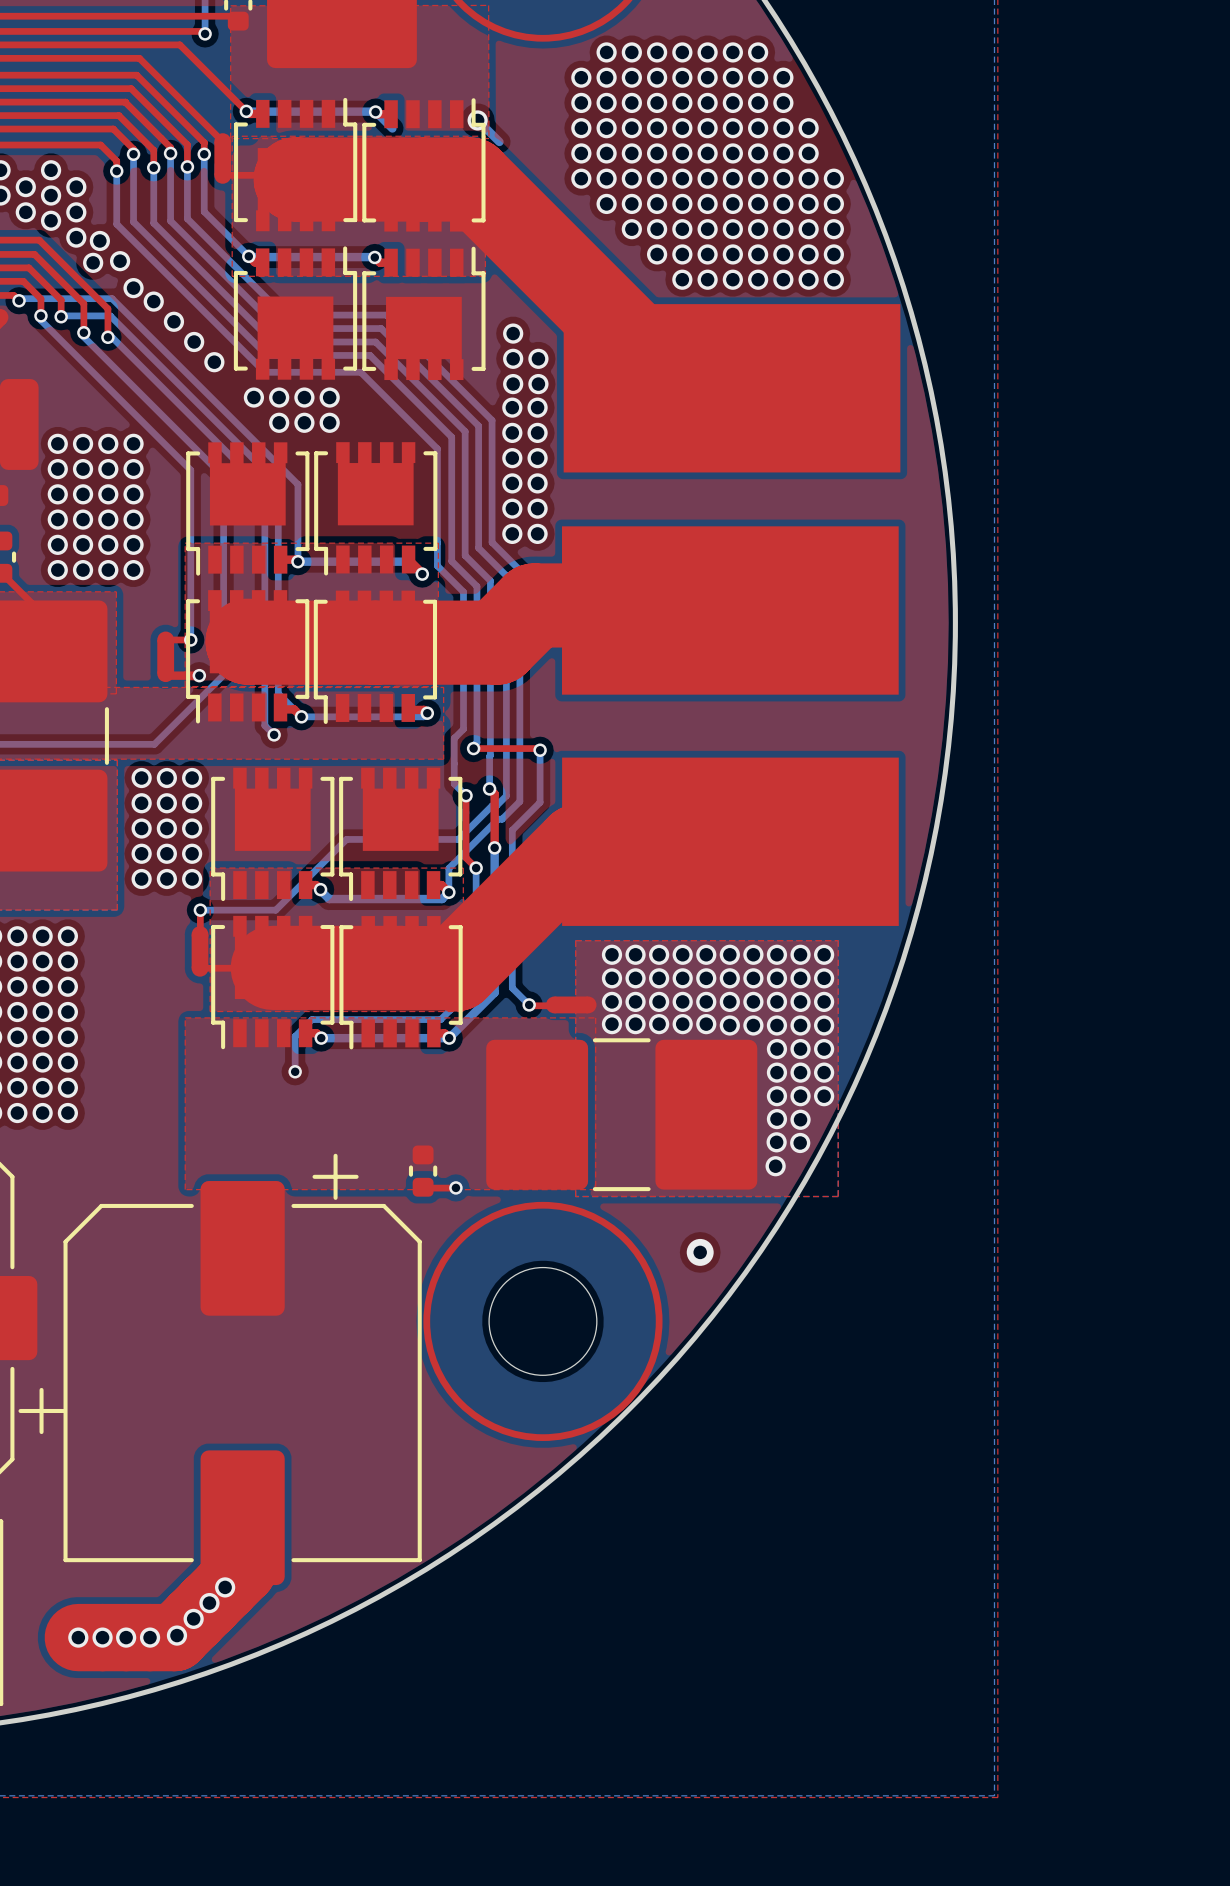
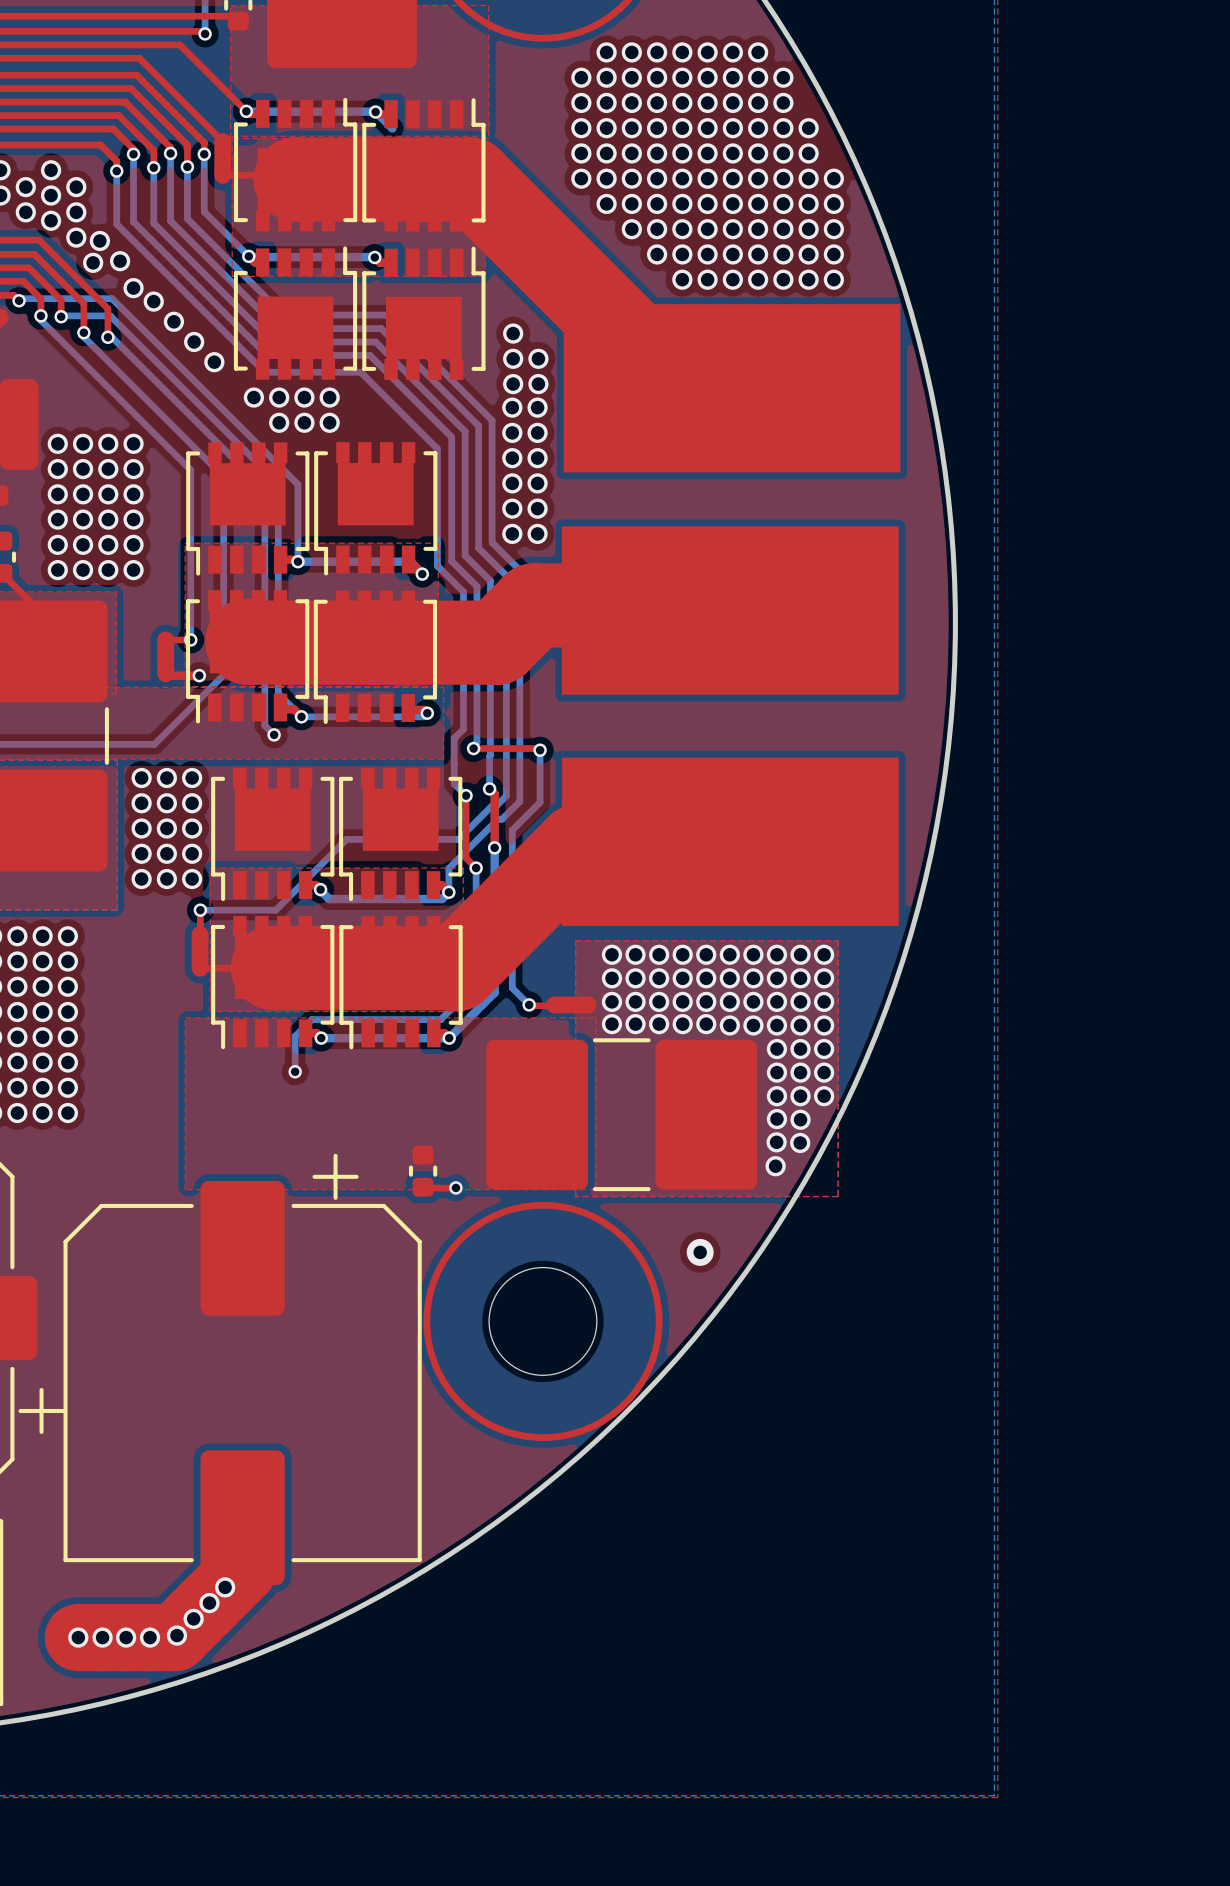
bottom track: (477, 120) (499, 141) -> none
via: (477, 120) -> none

